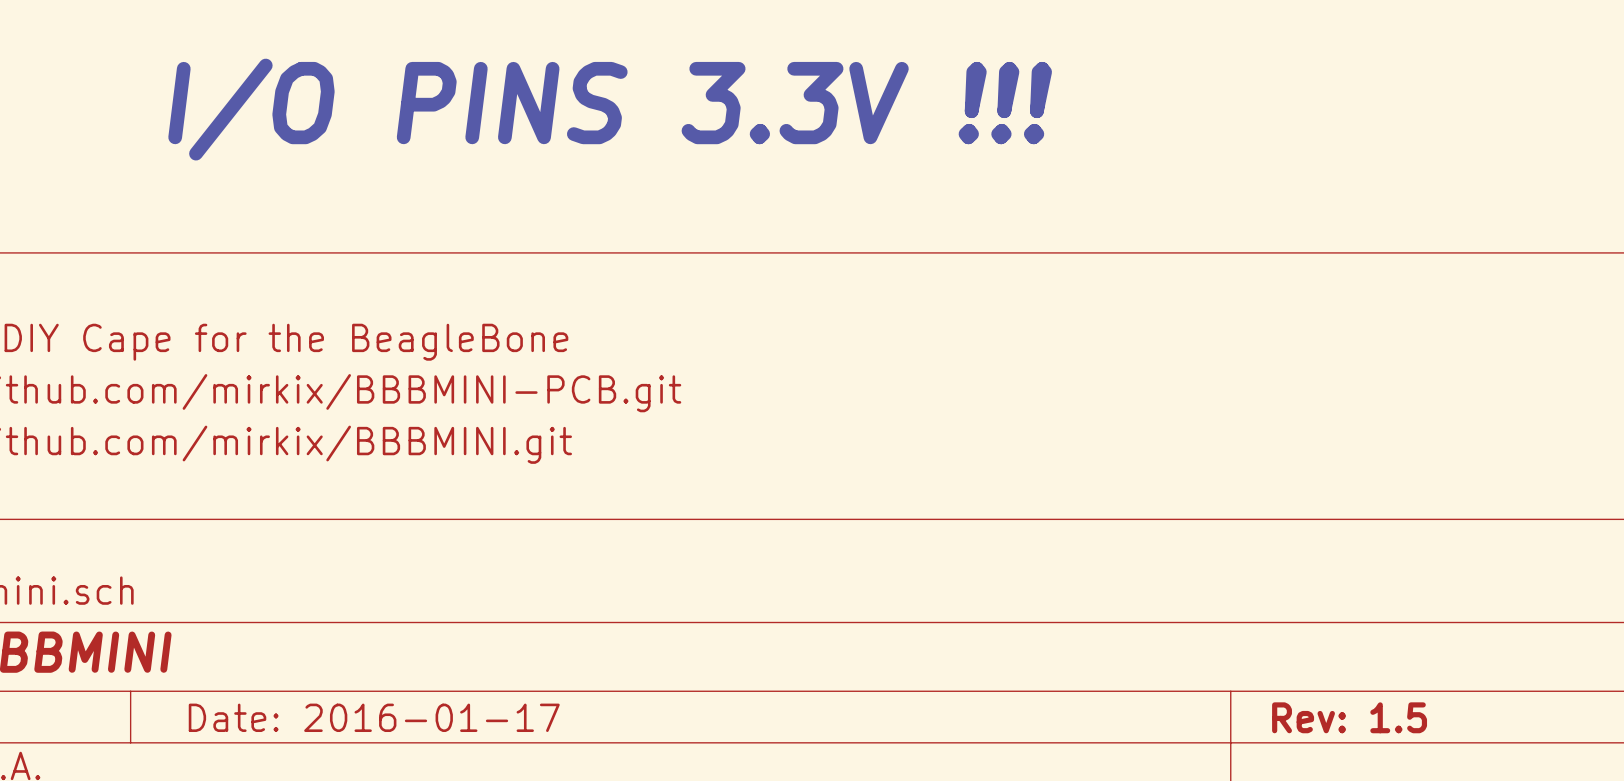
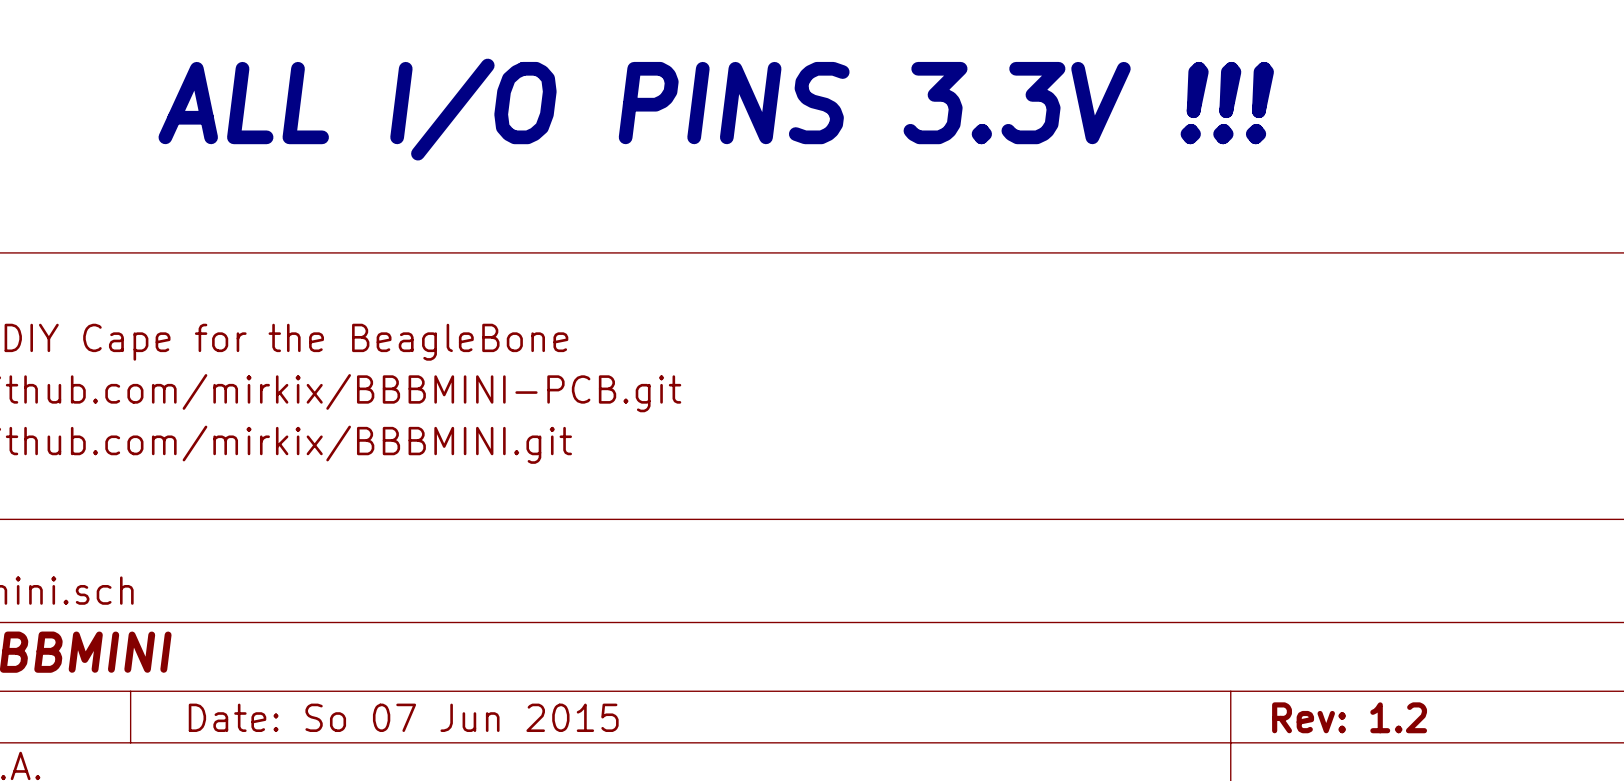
text: I/O PINS 3.3V !!! (610, 109) -> ALL I/O PINS 3.3V !!! (716, 109)
title block: Date: 2016-01-17 (374, 717) -> Date: So 07 Jun 2015 (403, 717)
title block: Rev: 1.5 (1349, 717) -> Rev: 1.2 (1349, 717)

